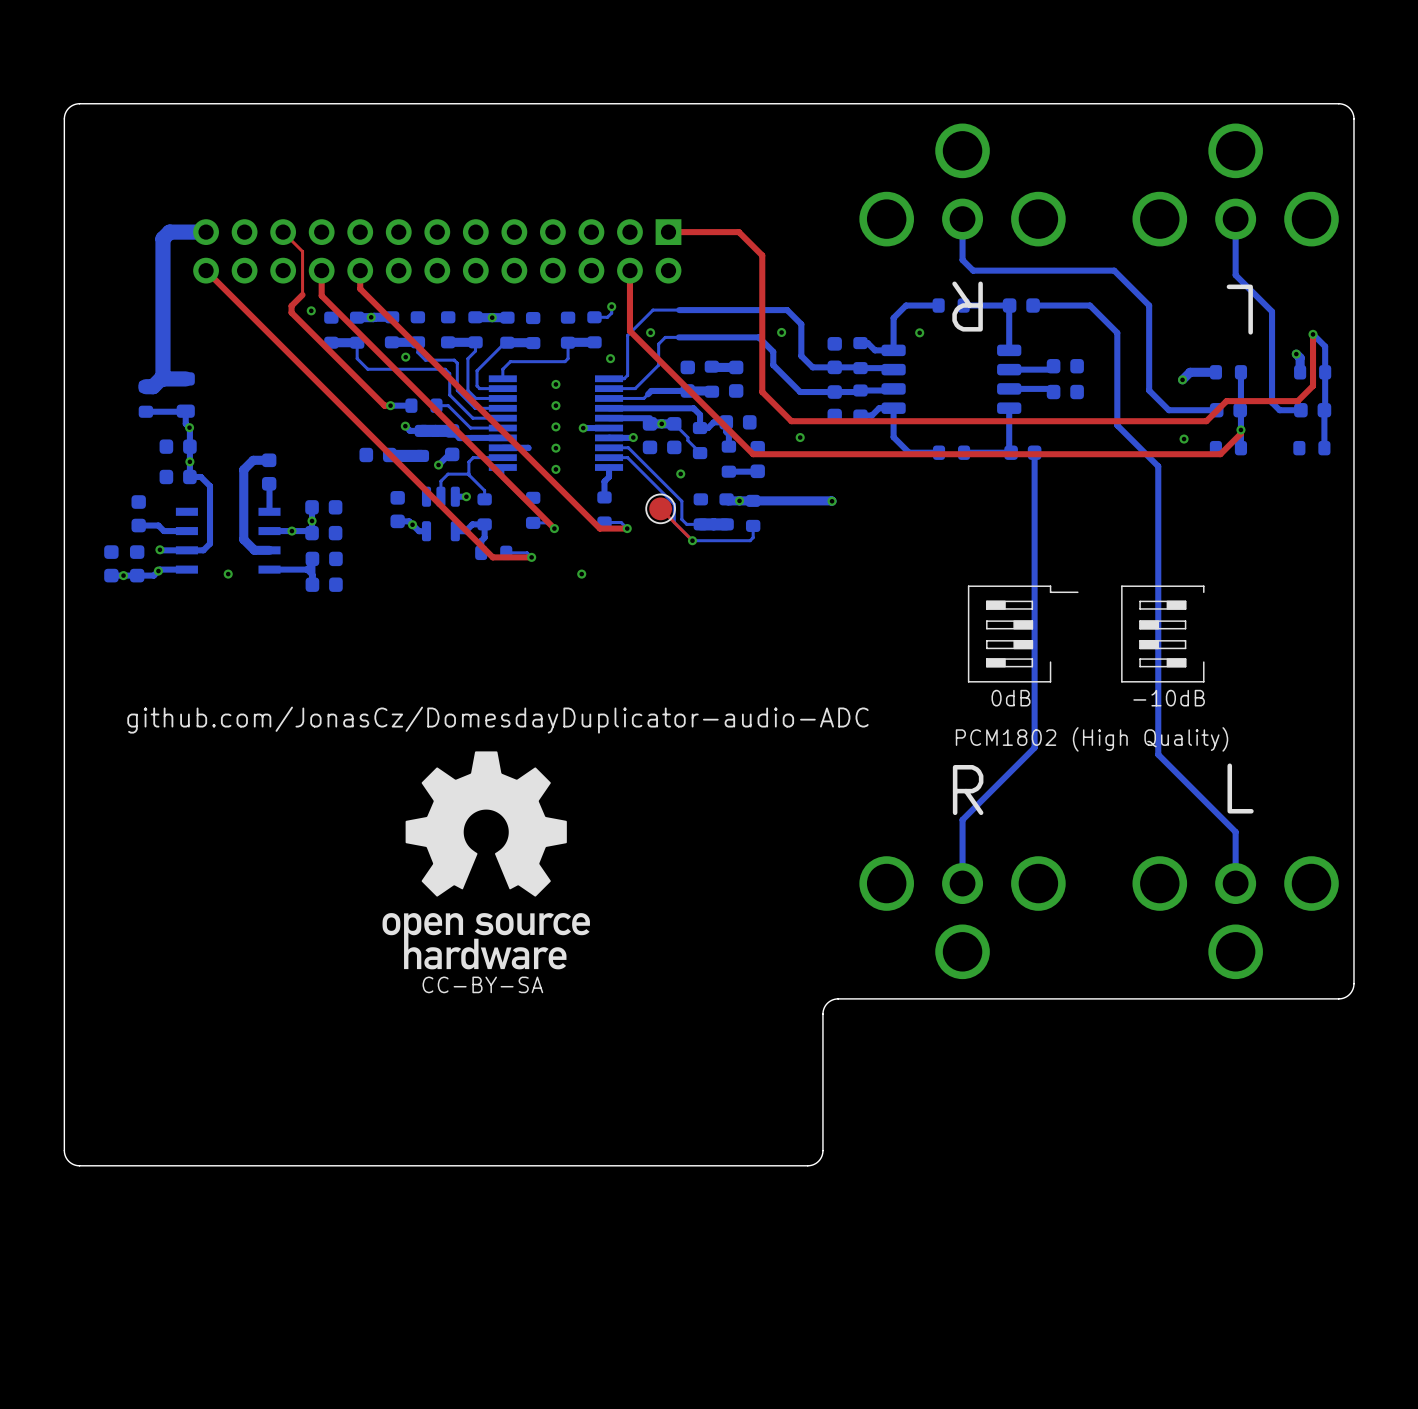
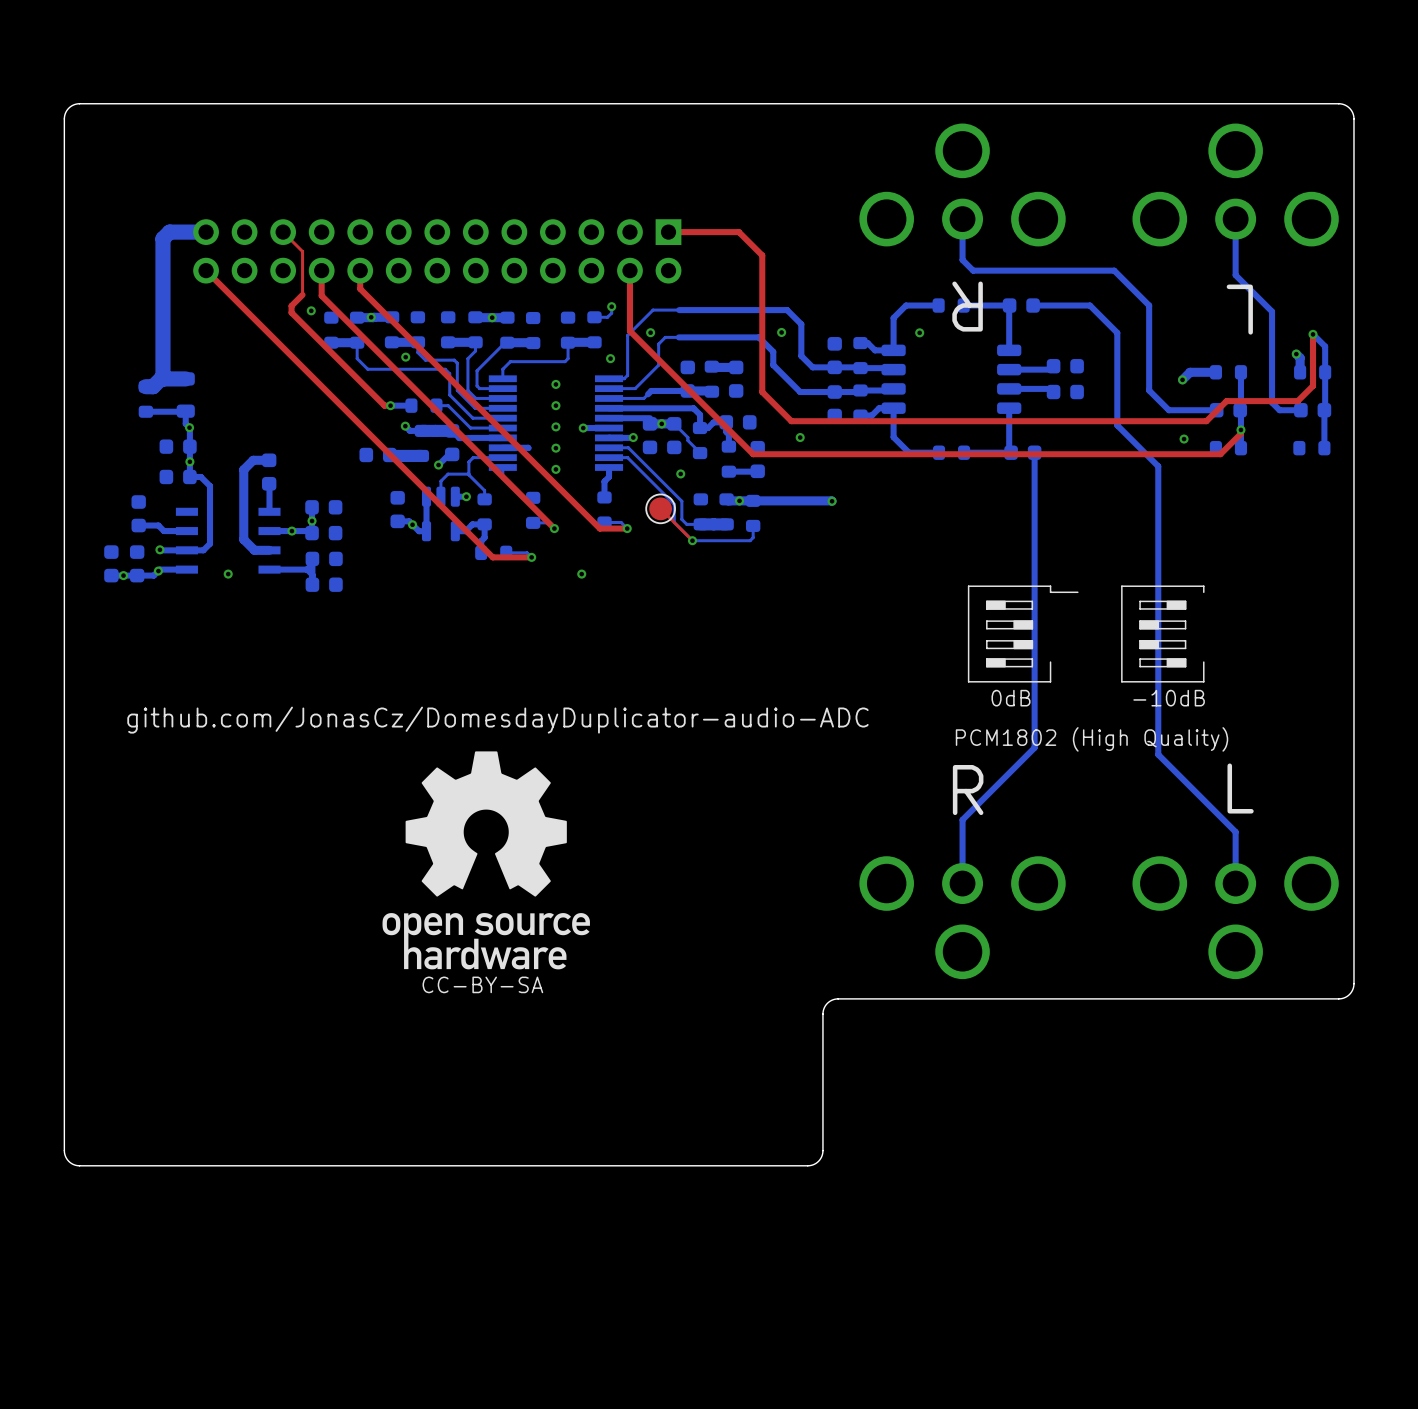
bottom track: none -> (426, 496) (426, 531)

